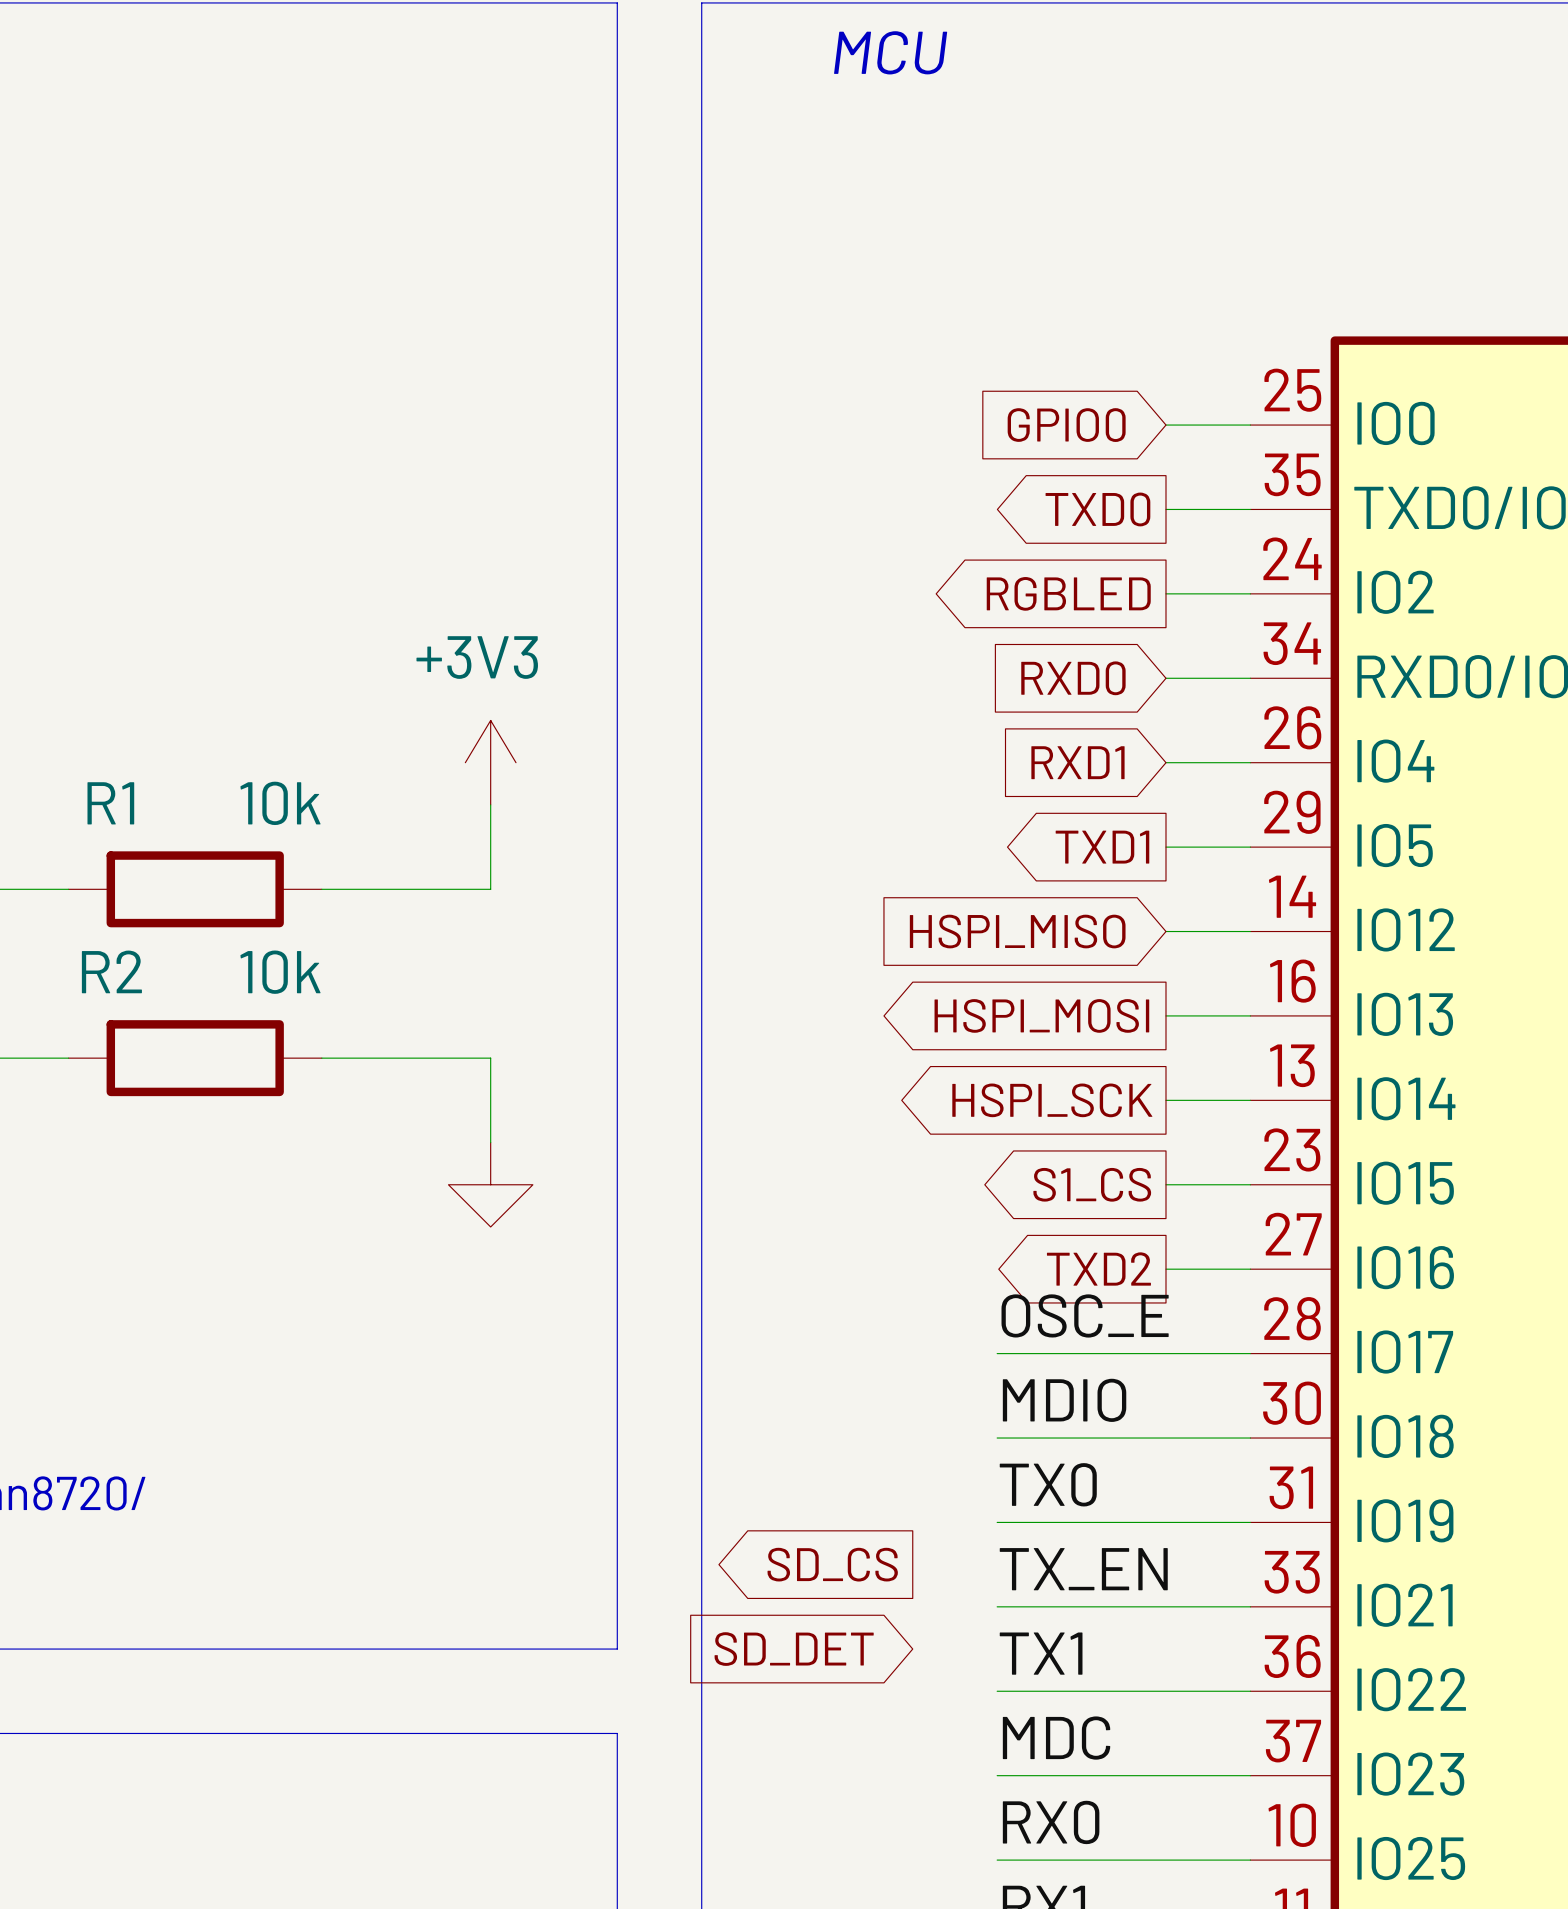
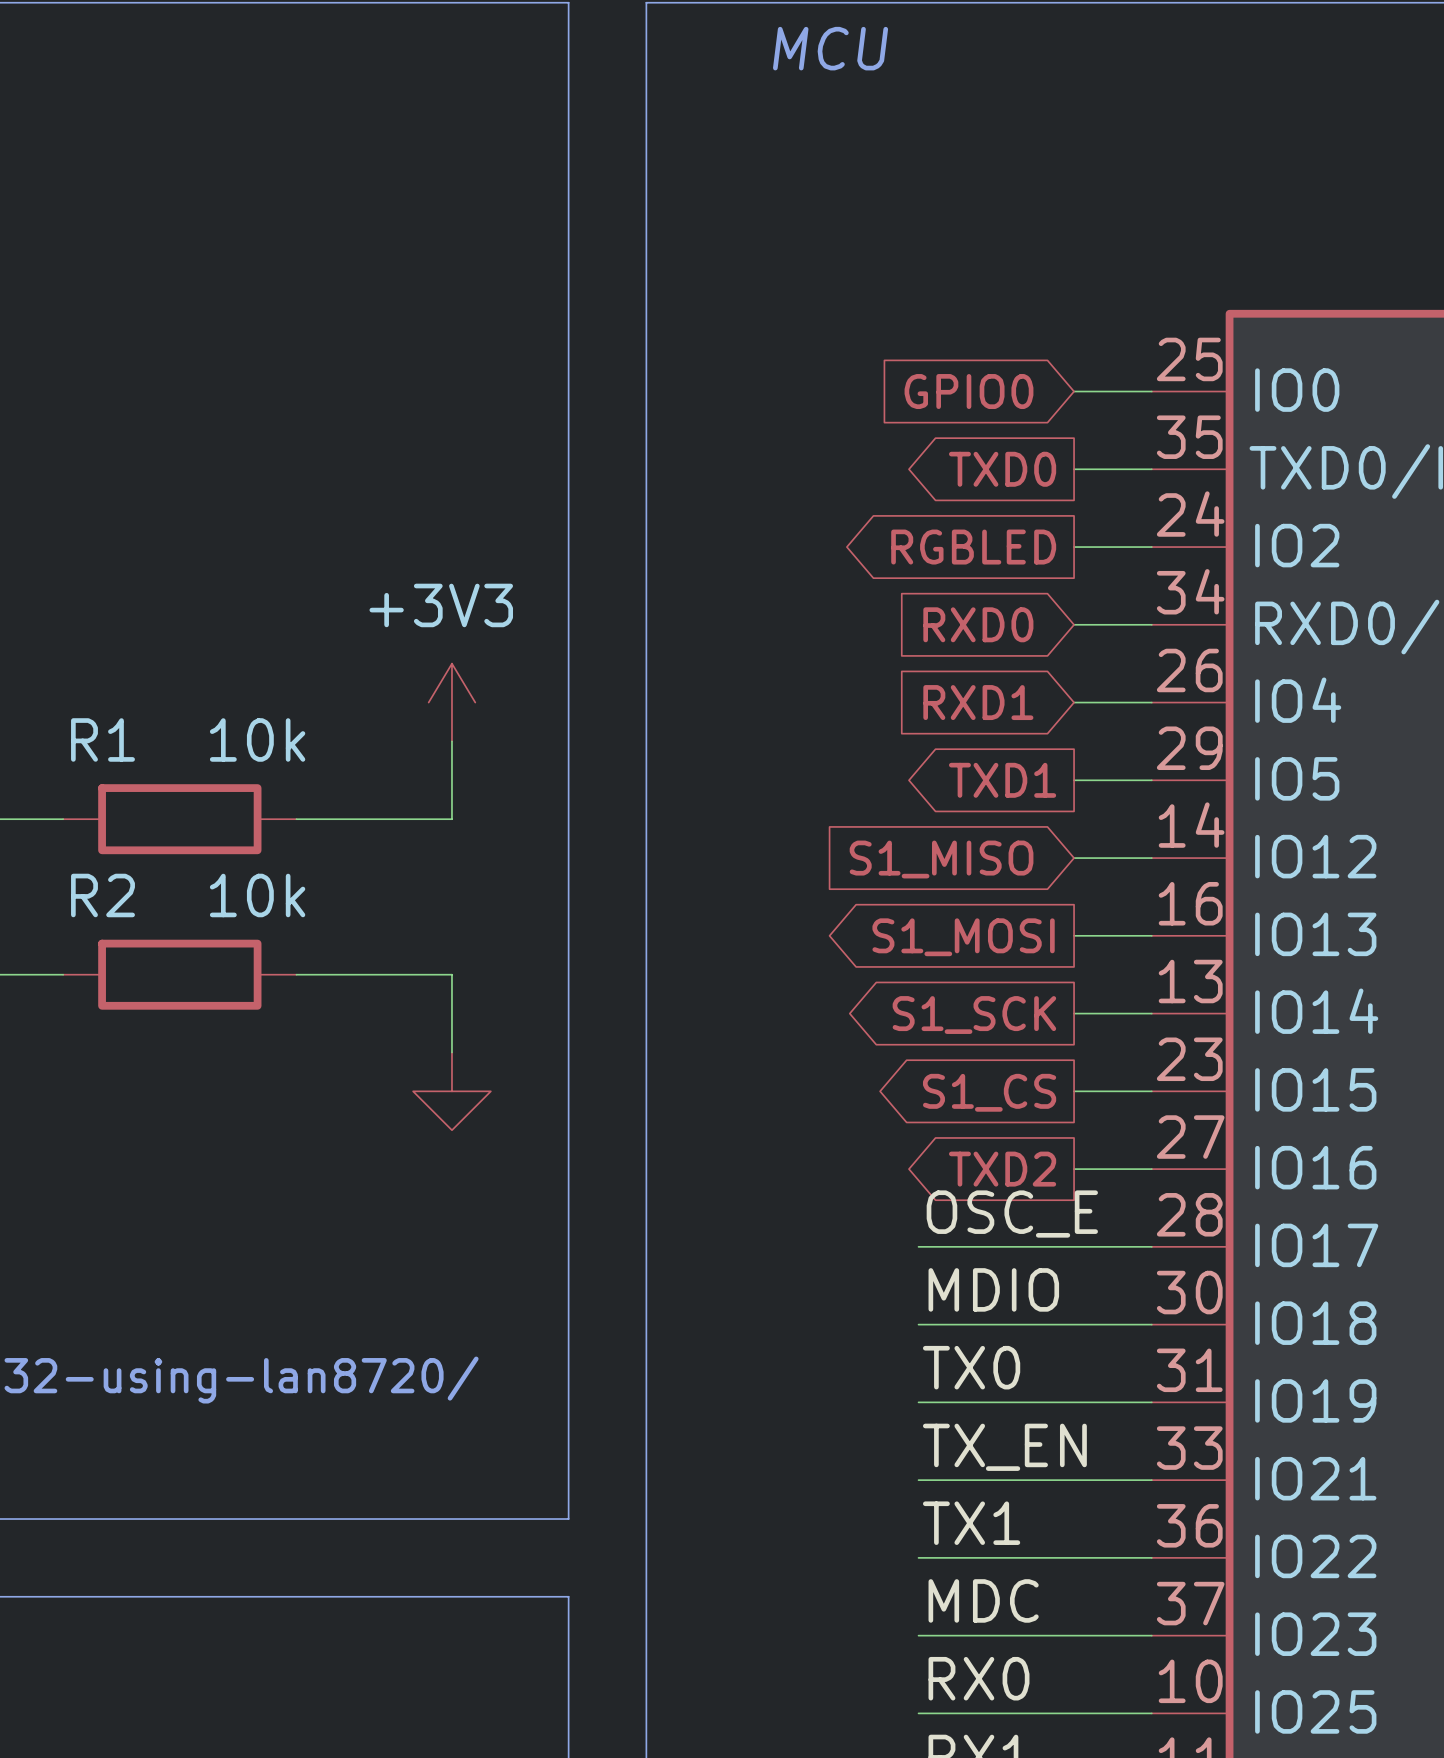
global label: HSPI_MISO (1017, 931) -> S1_MISO (941, 859)
global label: HSPI_MOSI (1041, 1015) -> S1_MOSI (963, 937)
global label: HSPI_SCK (1052, 1100) -> S1_SCK (974, 1015)
global label: SD_CS (832, 1564) -> none
global label: SD_DET (794, 1649) -> none

